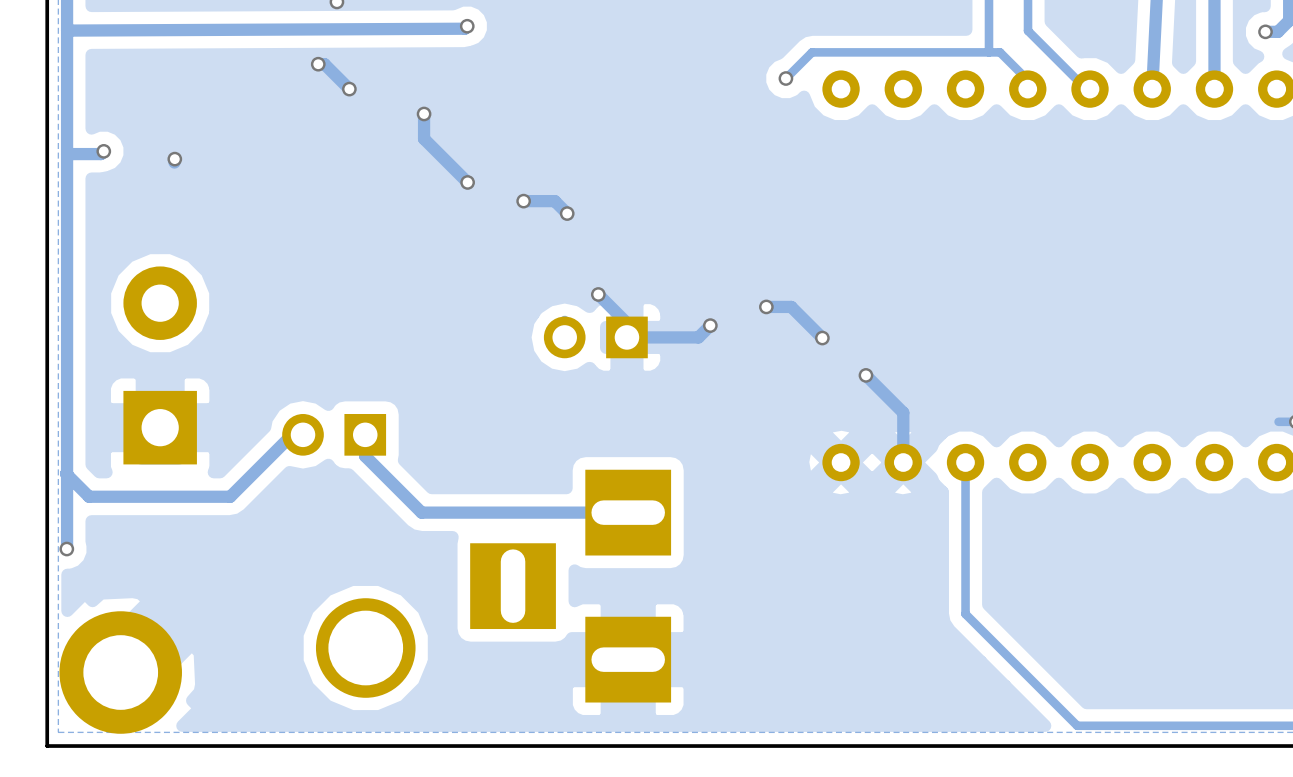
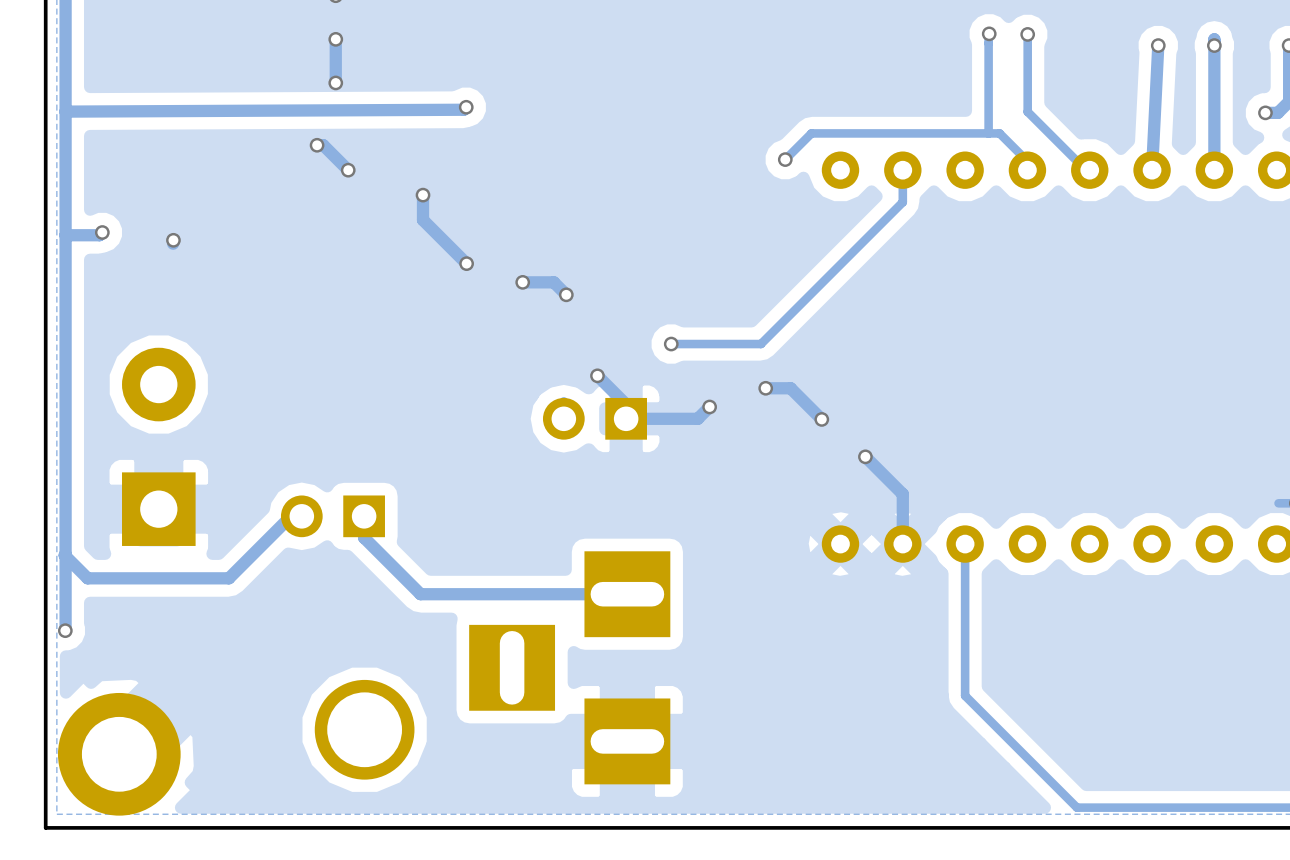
track: none -> (902, 170) (902, 202) (760, 344) (671, 344)
via: none -> (671, 344)

